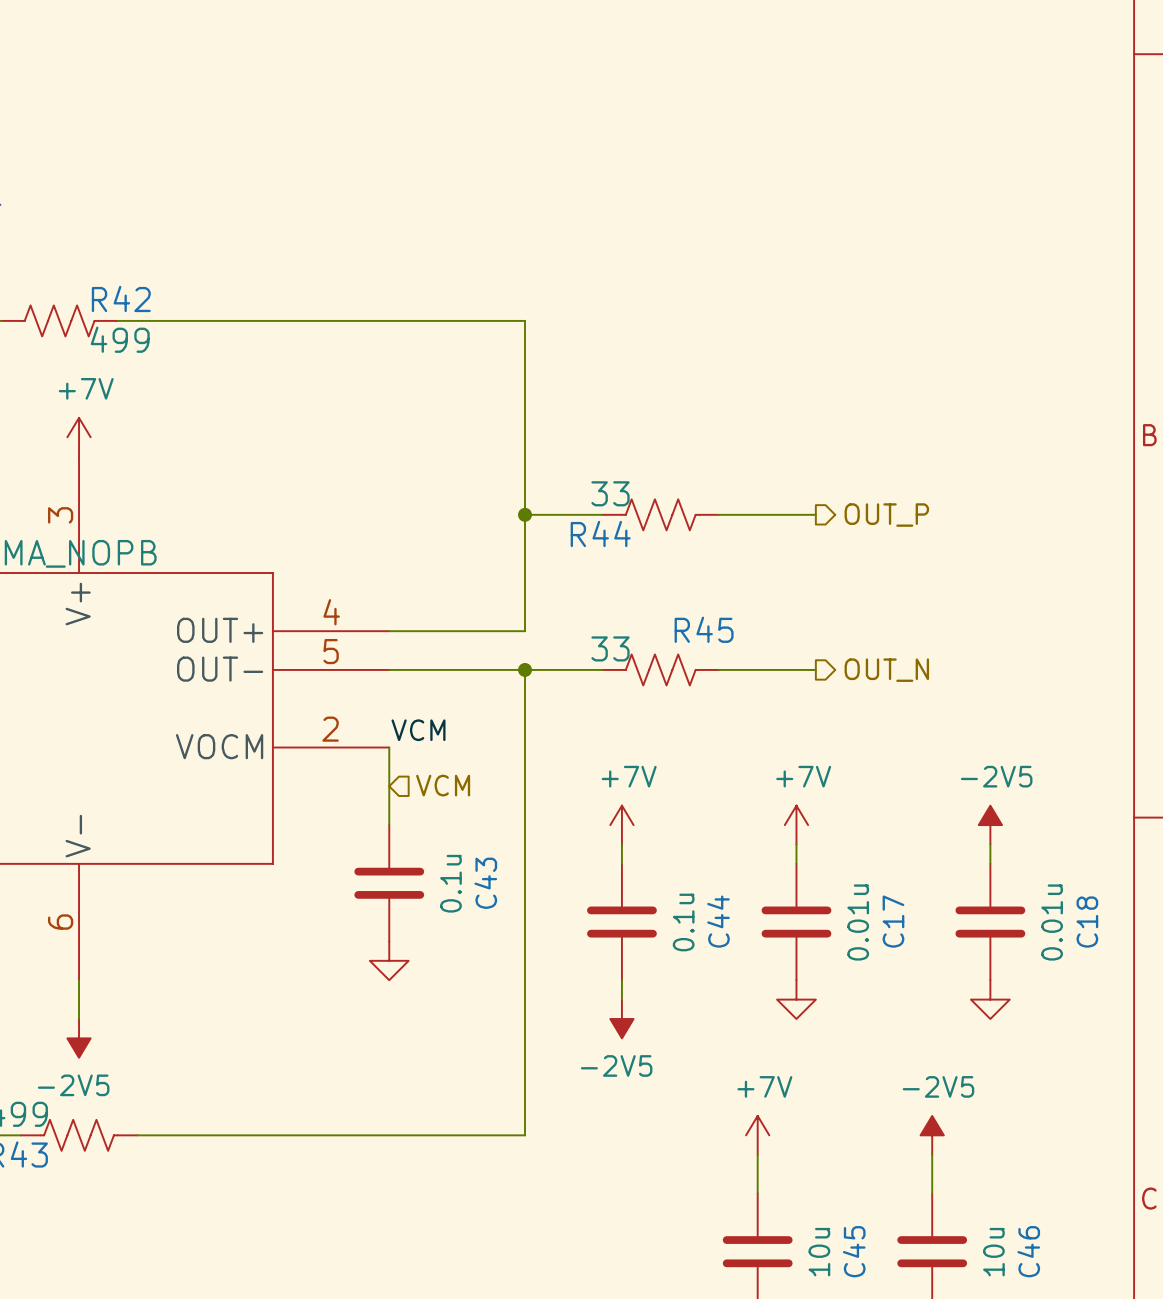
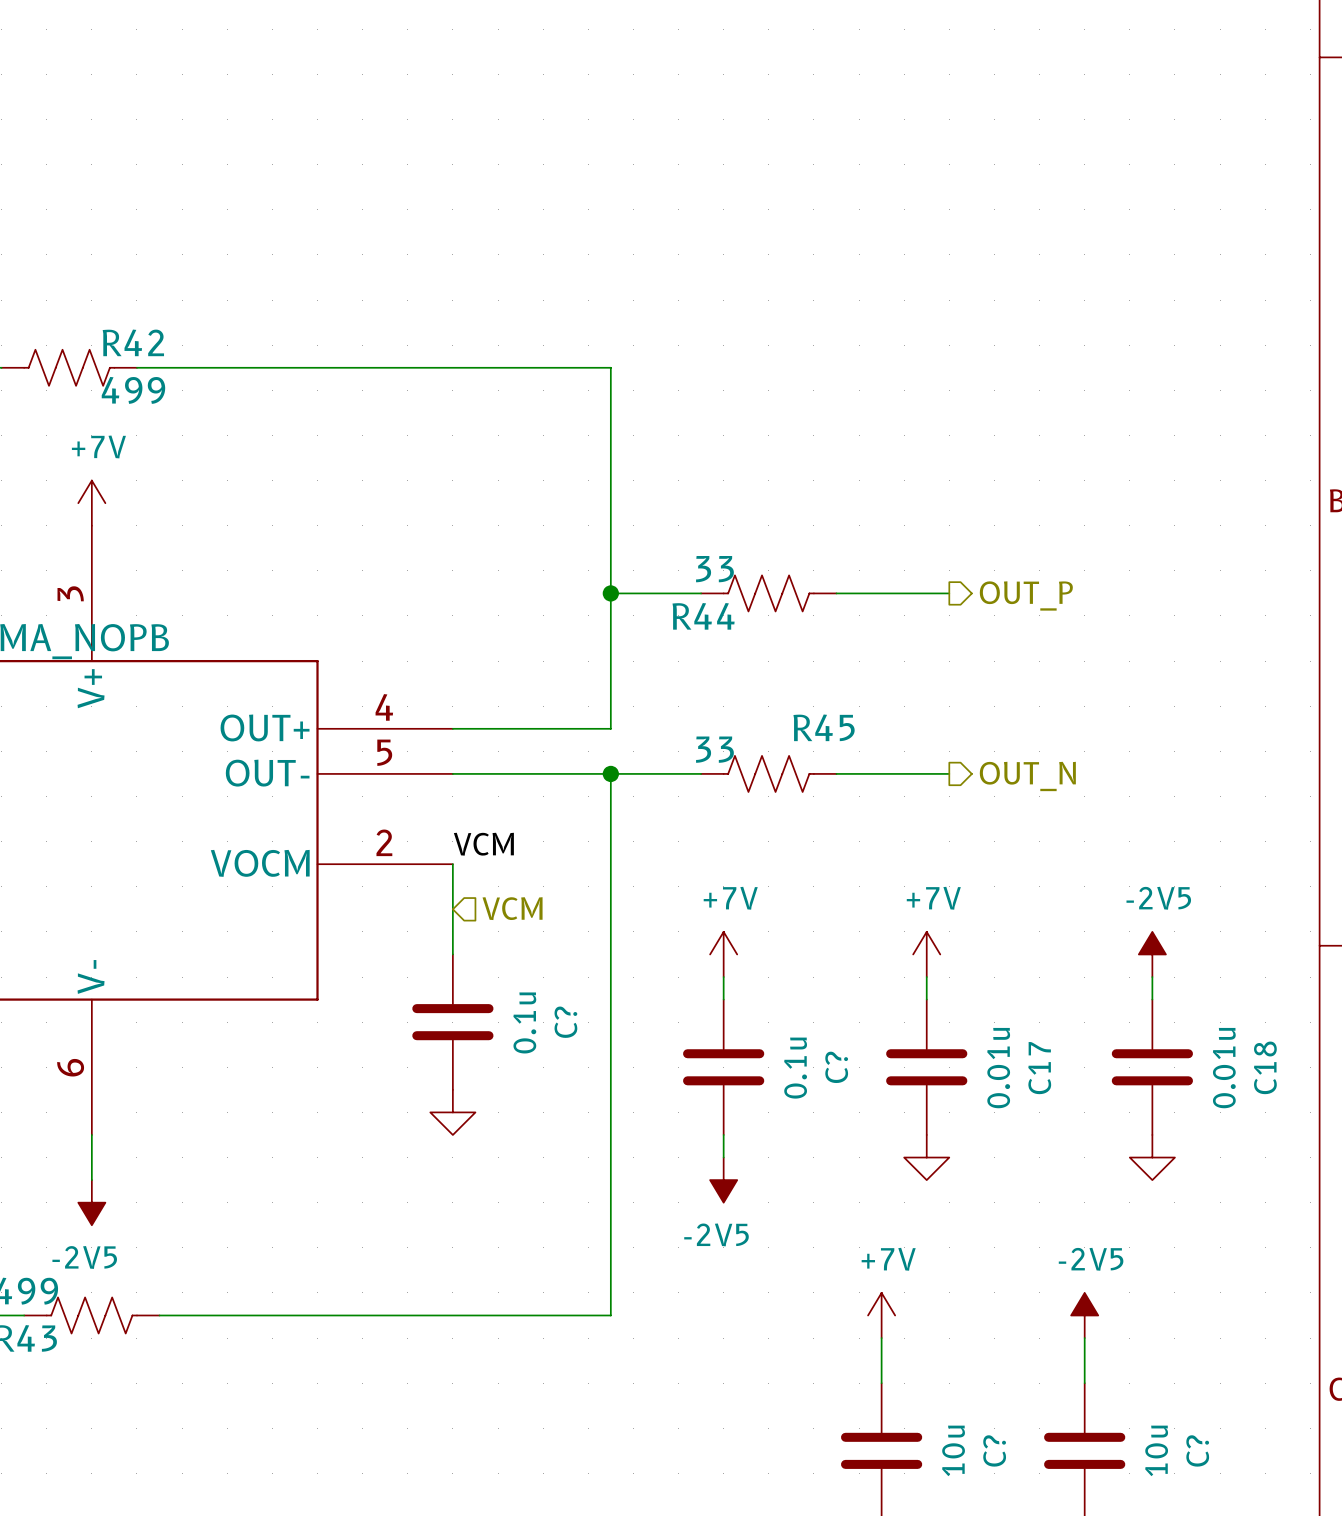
C43 name: C43 (485, 883) -> C? (565, 1022)
C44 name: C44 (718, 921) -> C? (836, 1067)
C45 name: C45 (854, 1251) -> C? (994, 1450)
C46 name: C46 (1028, 1251) -> C? (1197, 1450)

